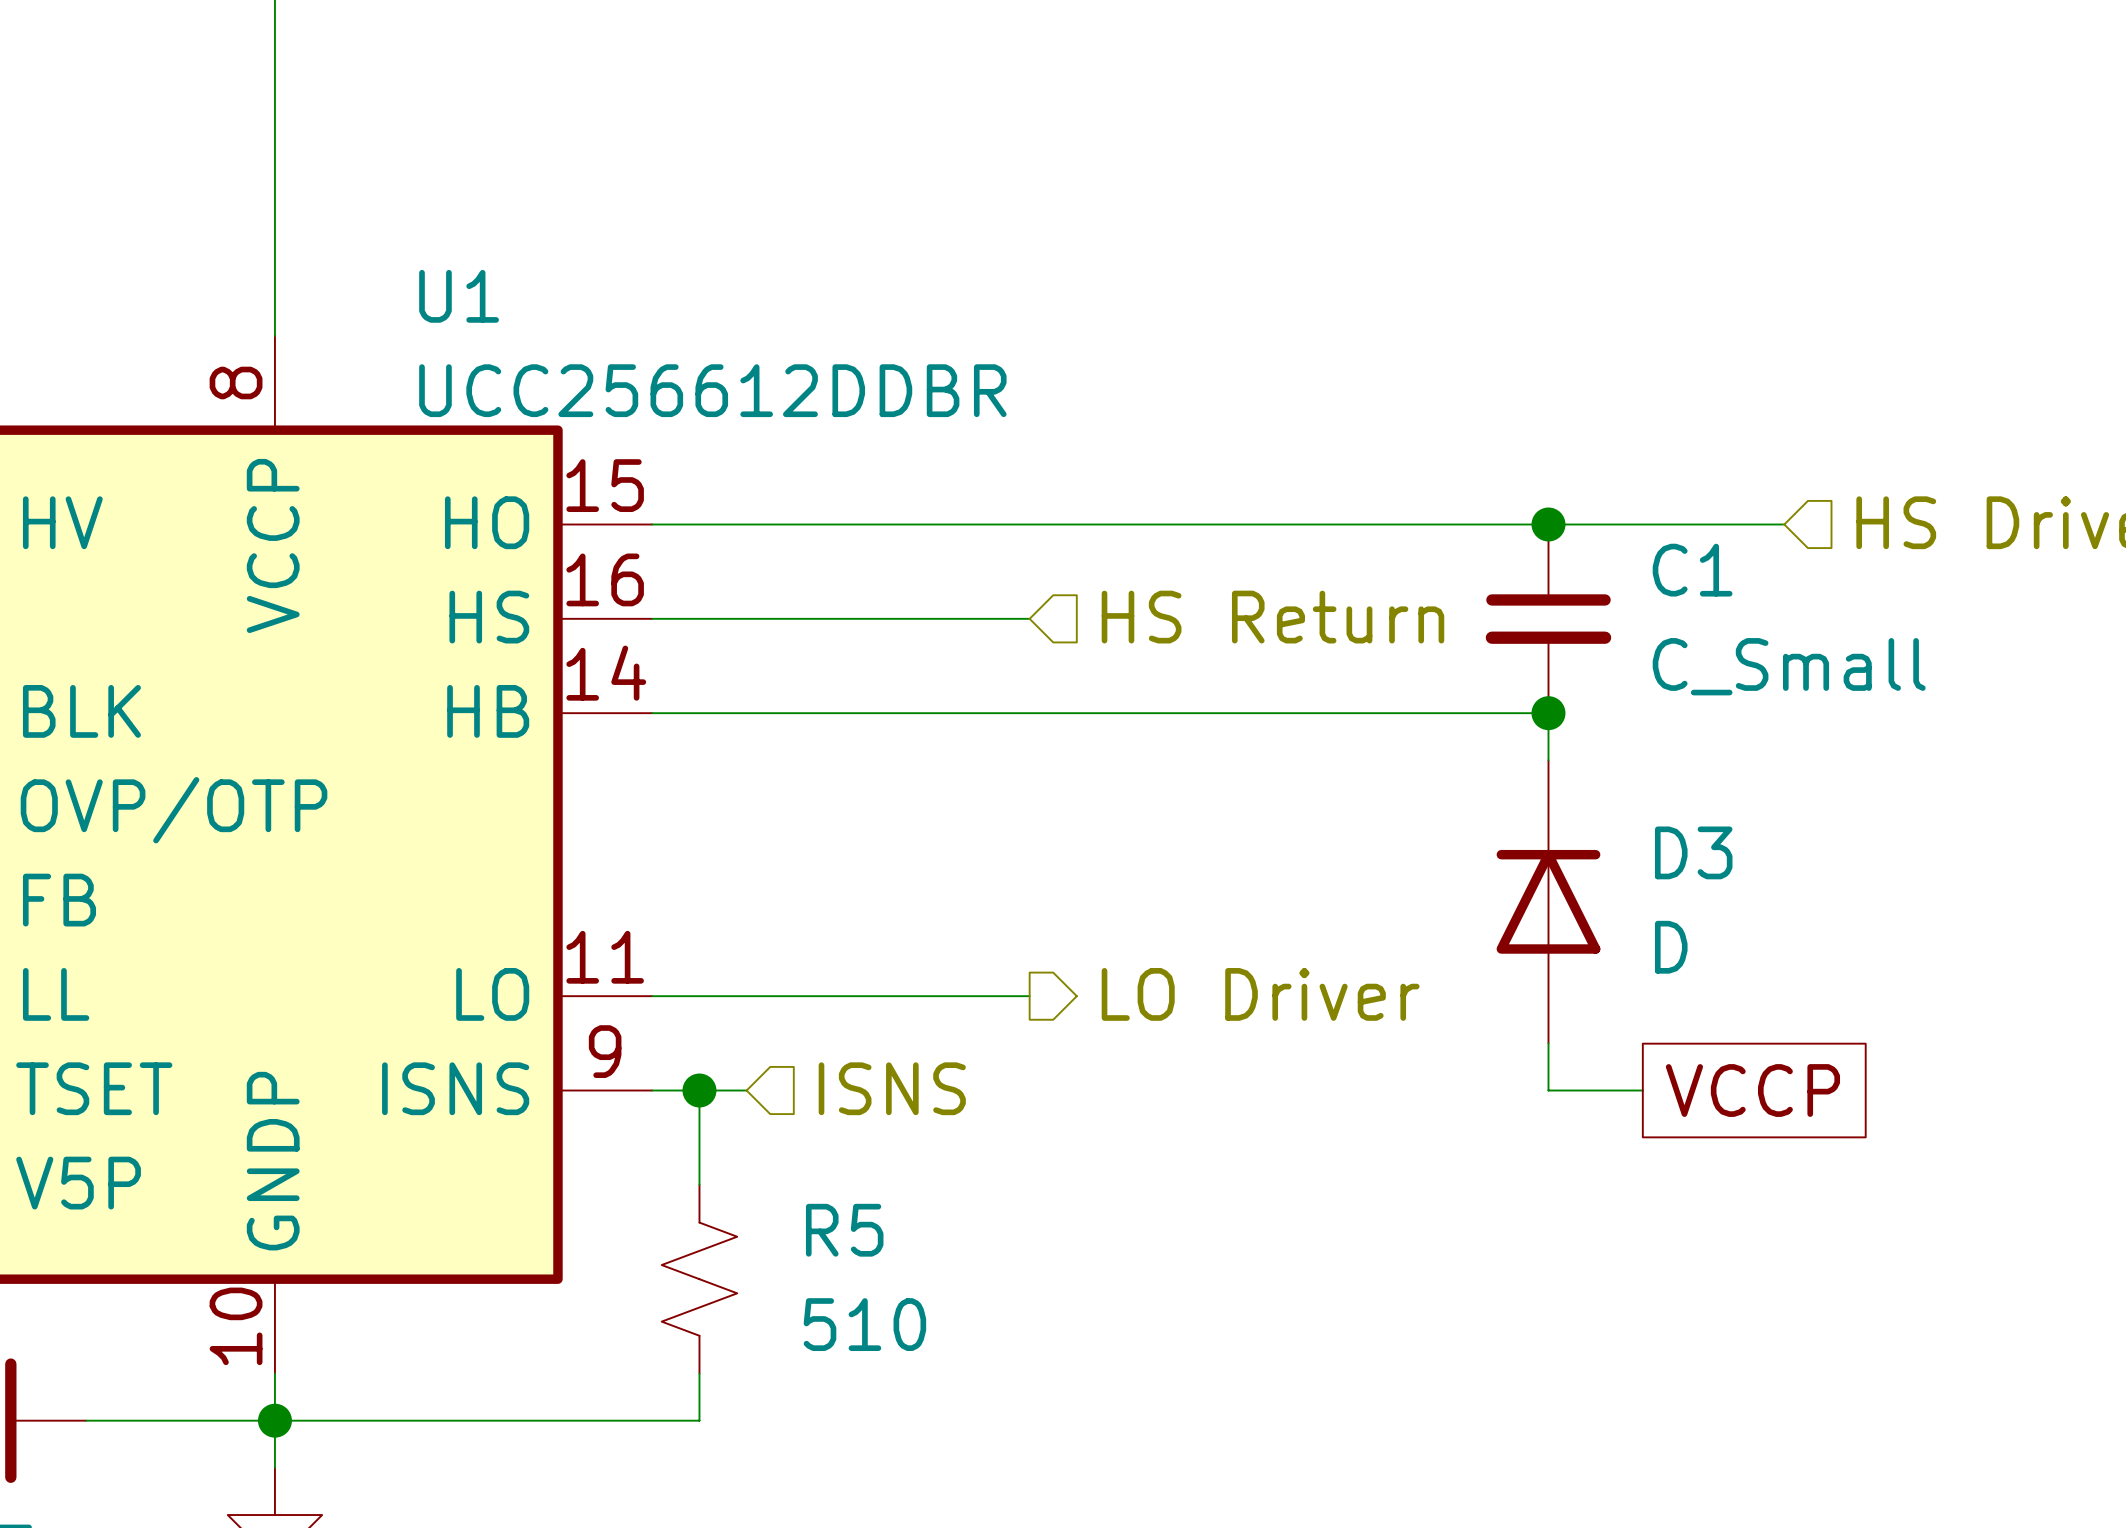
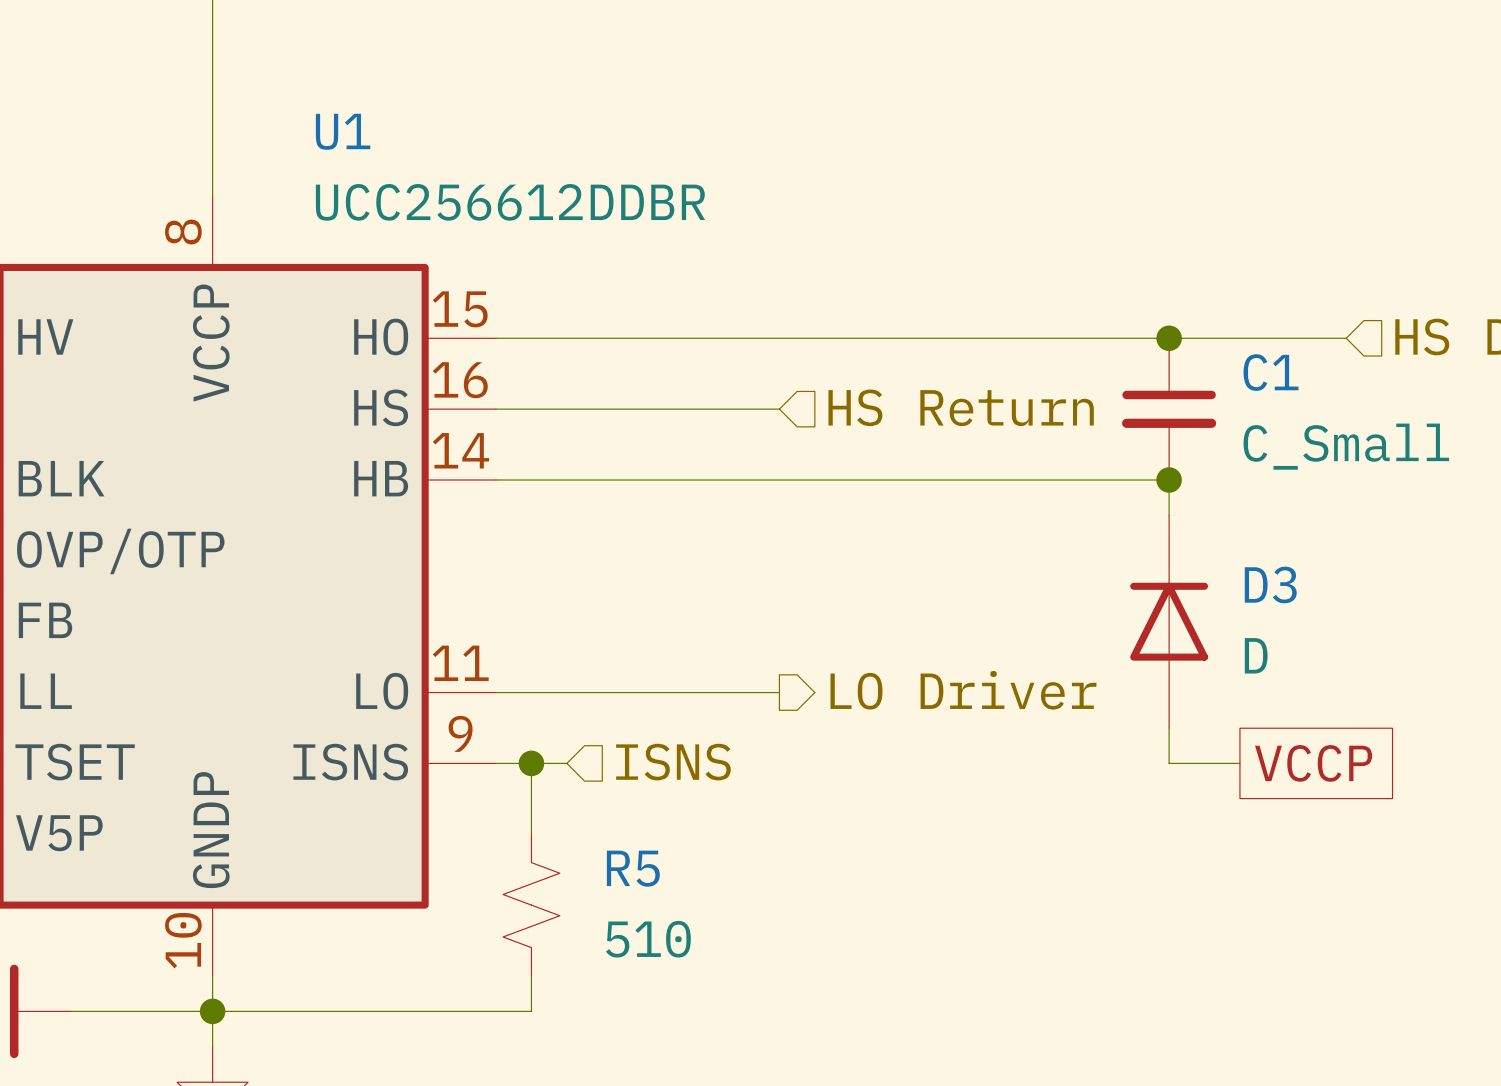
U1 name position: U1 (459, 296) -> U1 (343, 131)
U1 value position: UCC256612DDBR (712, 390) -> UCC256612DDBR (510, 202)

